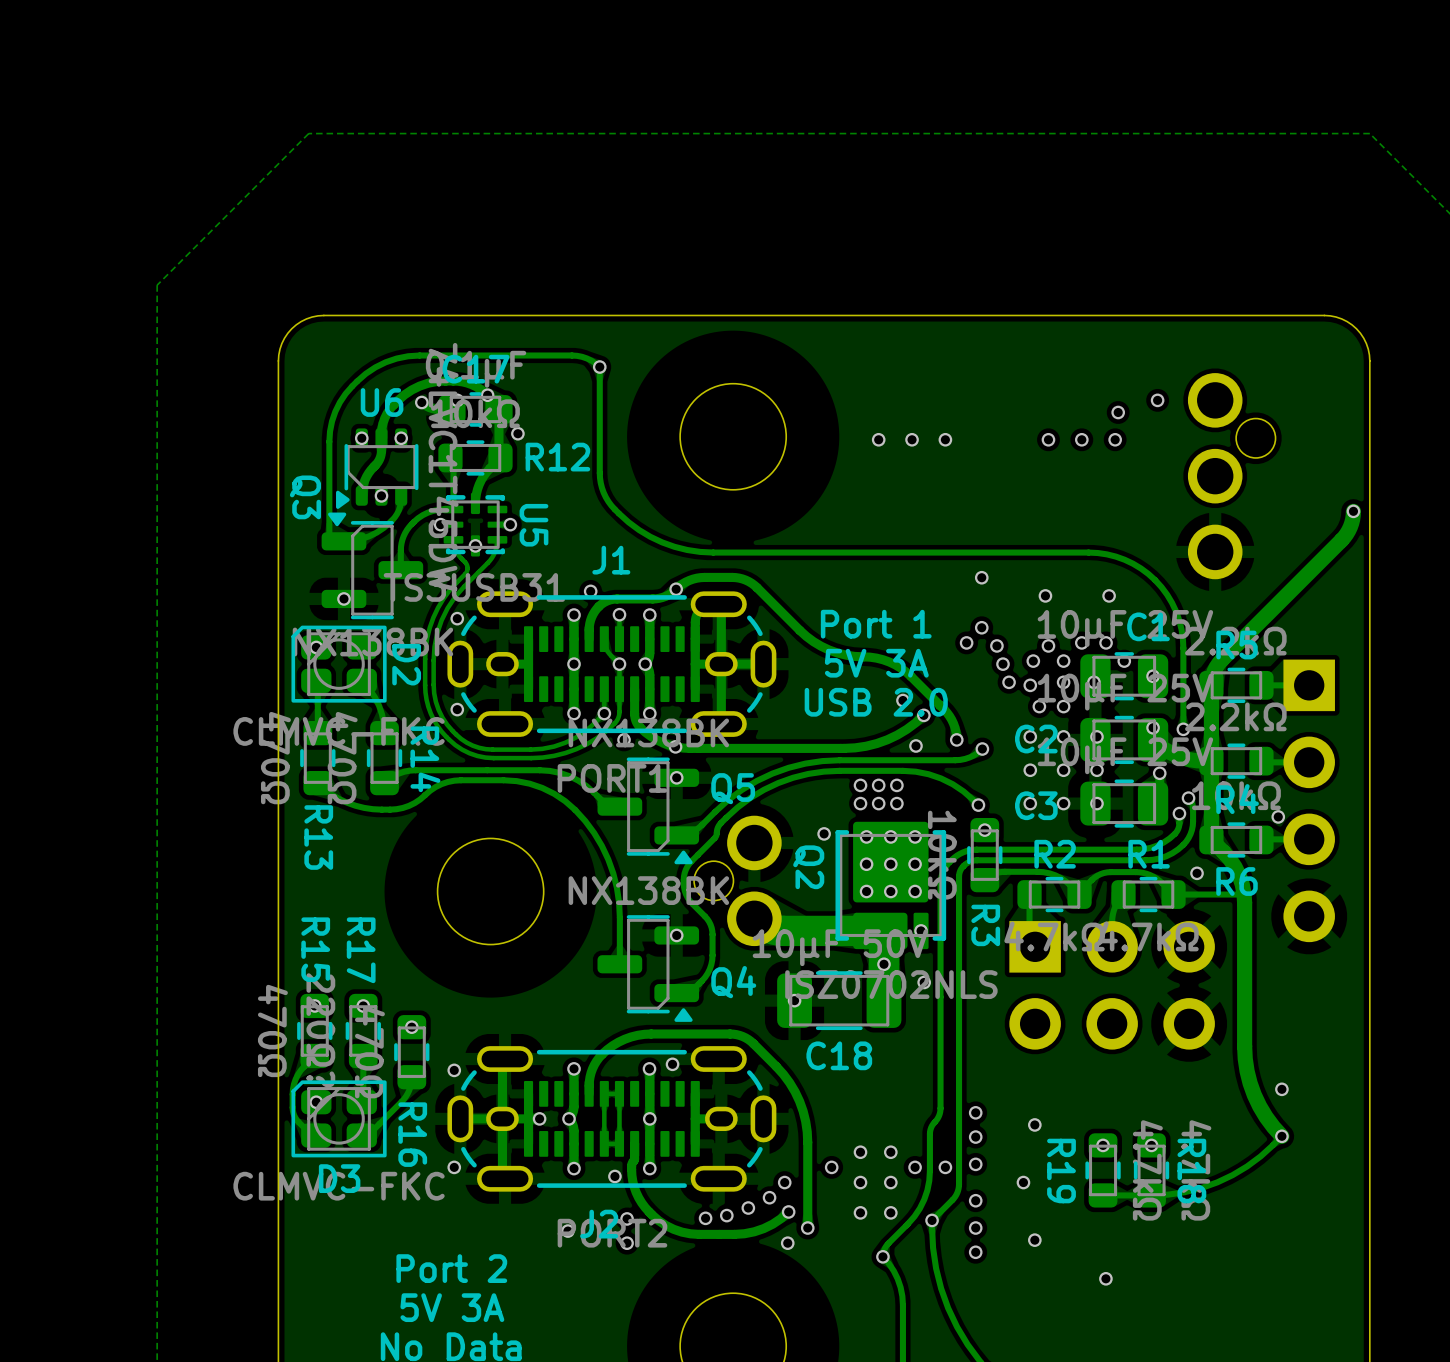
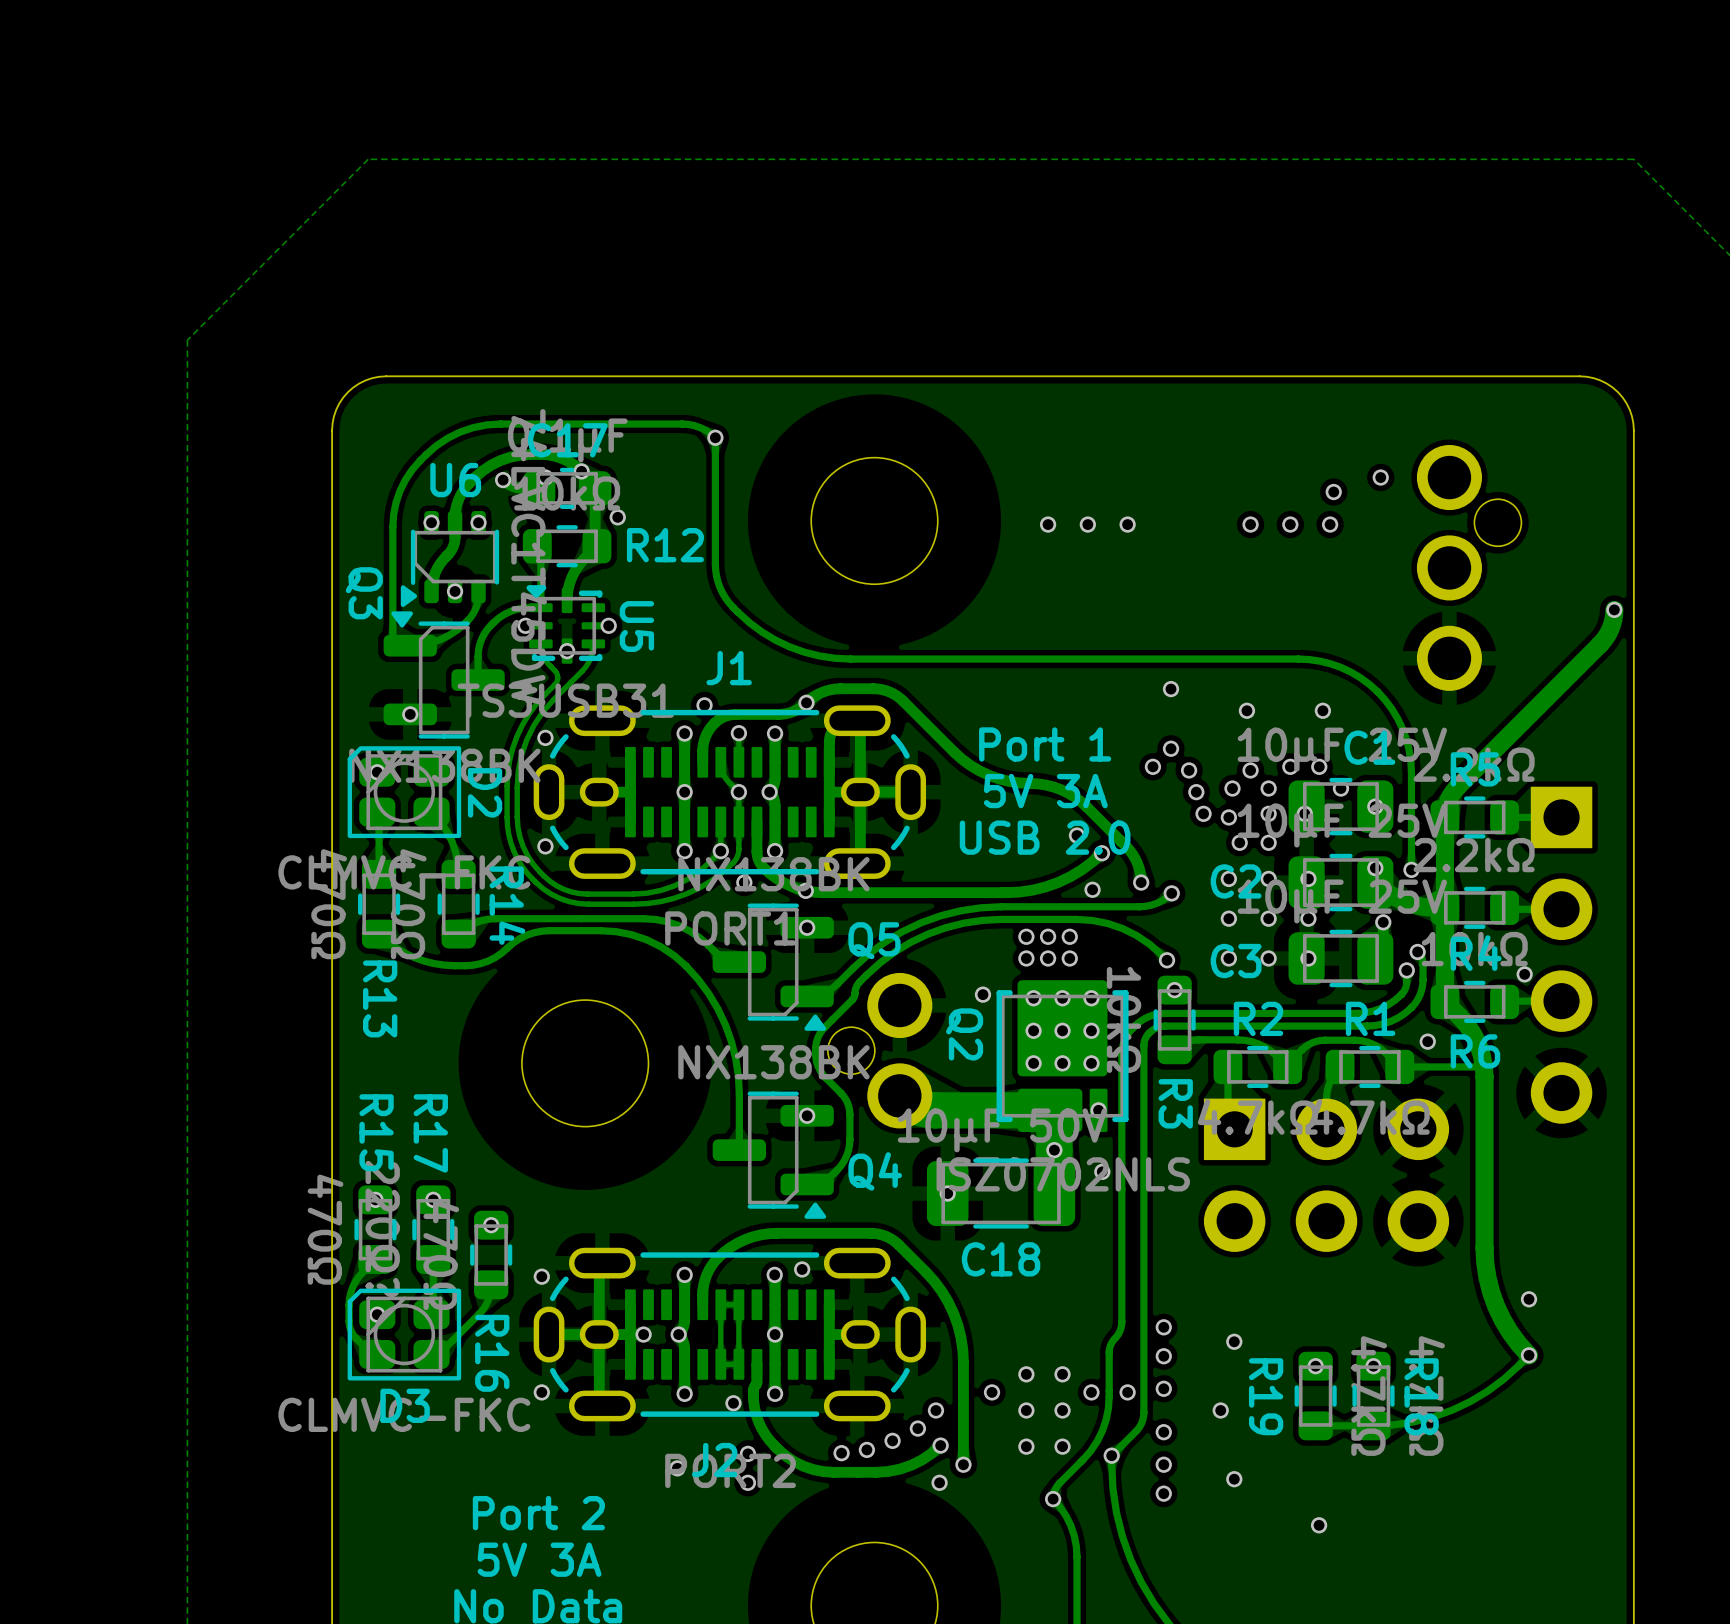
U5 footprint: [443, 492, 508, 557] -> [526, 585, 606, 664]

